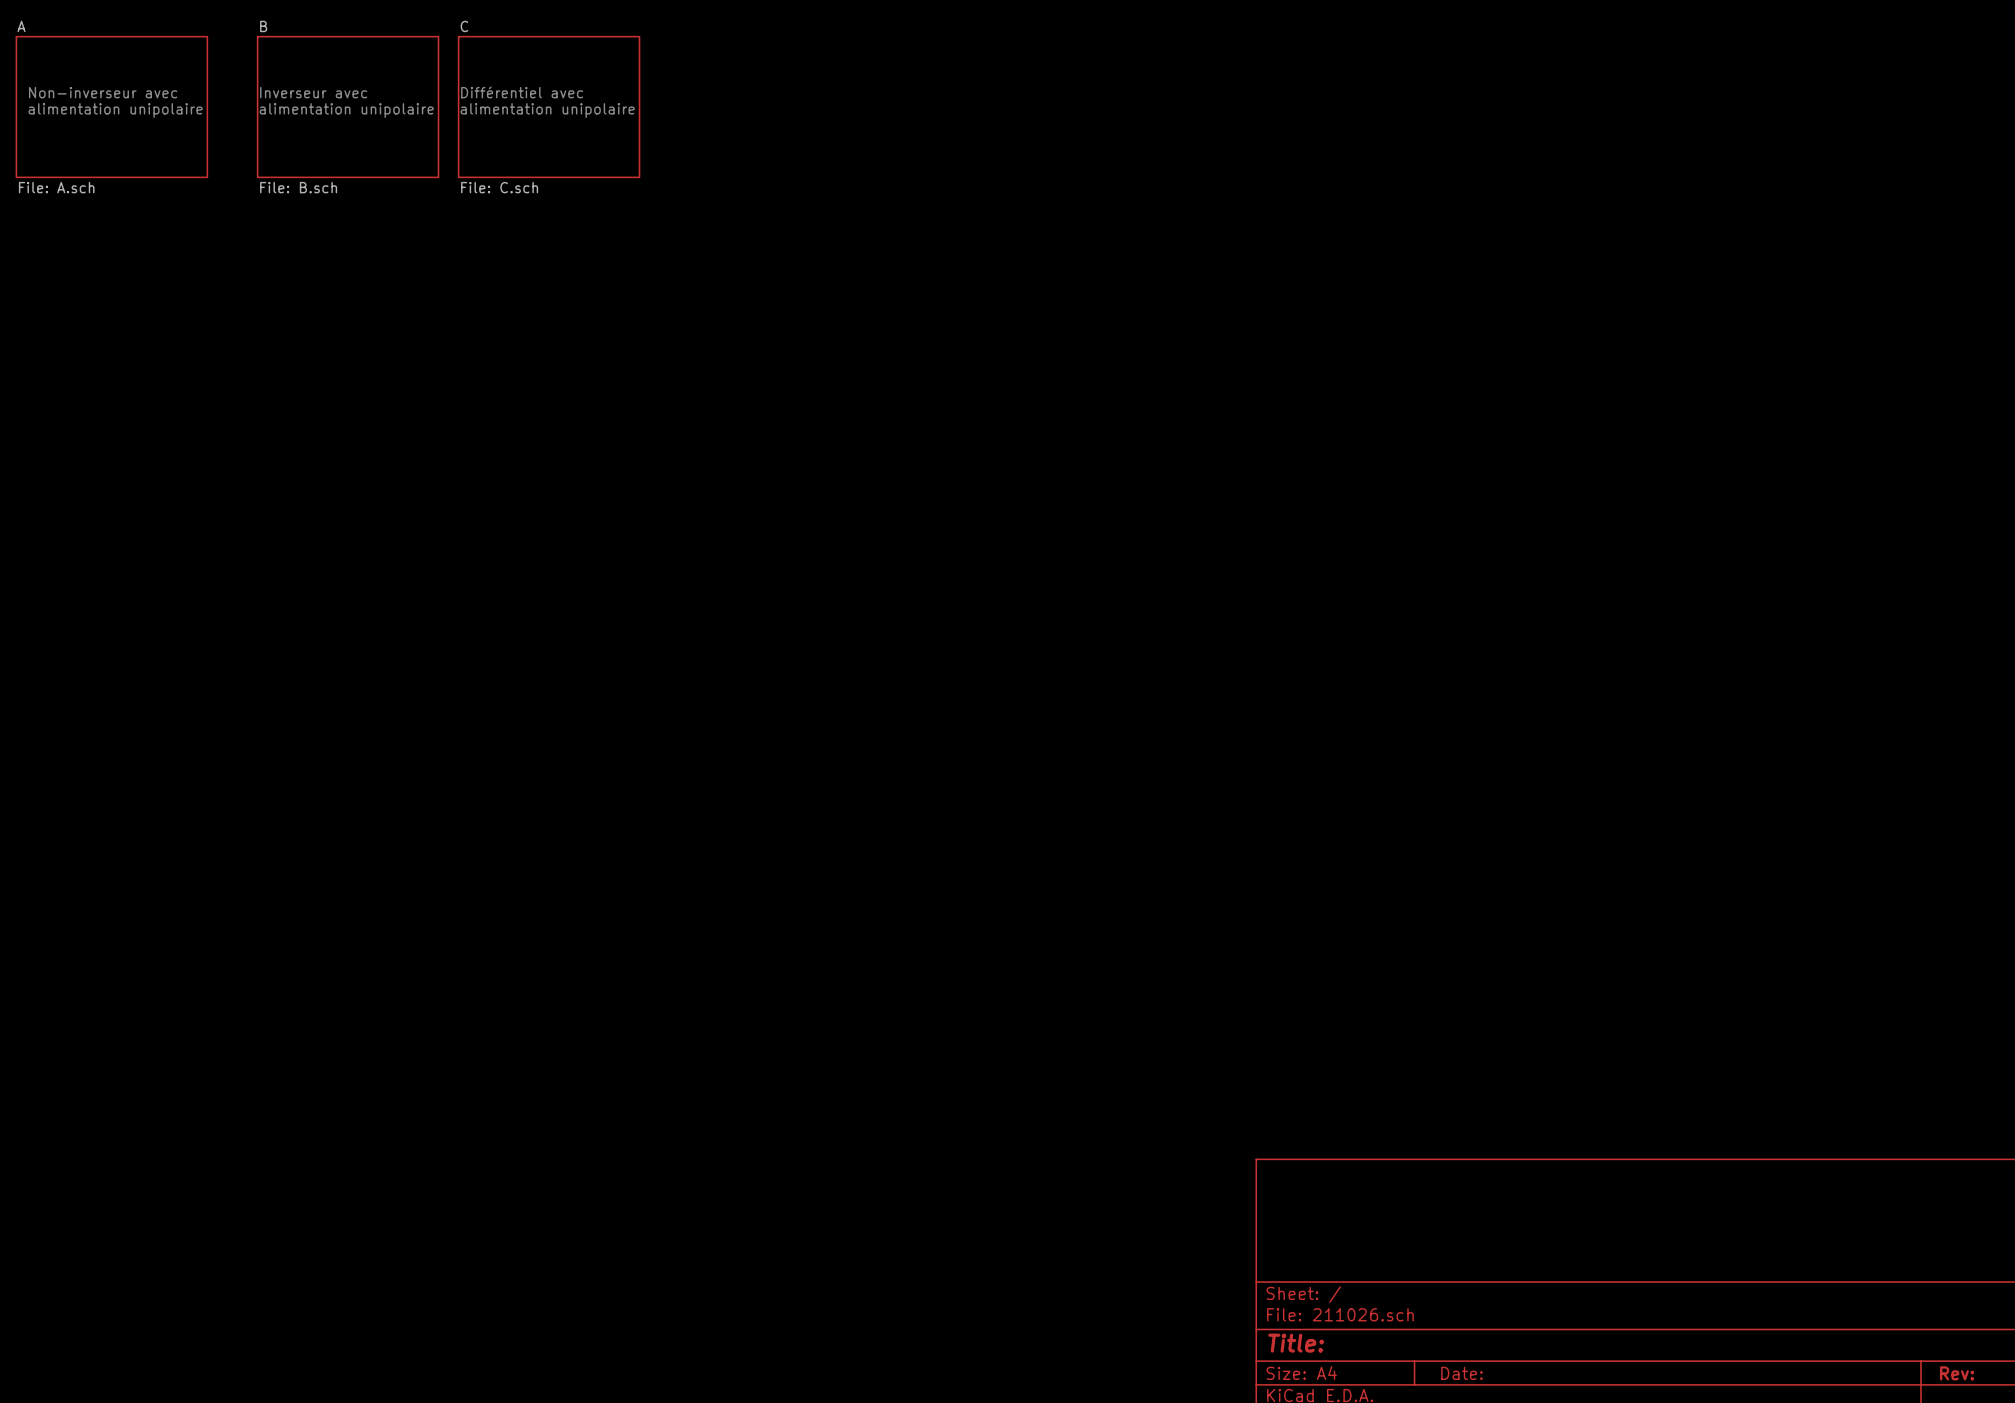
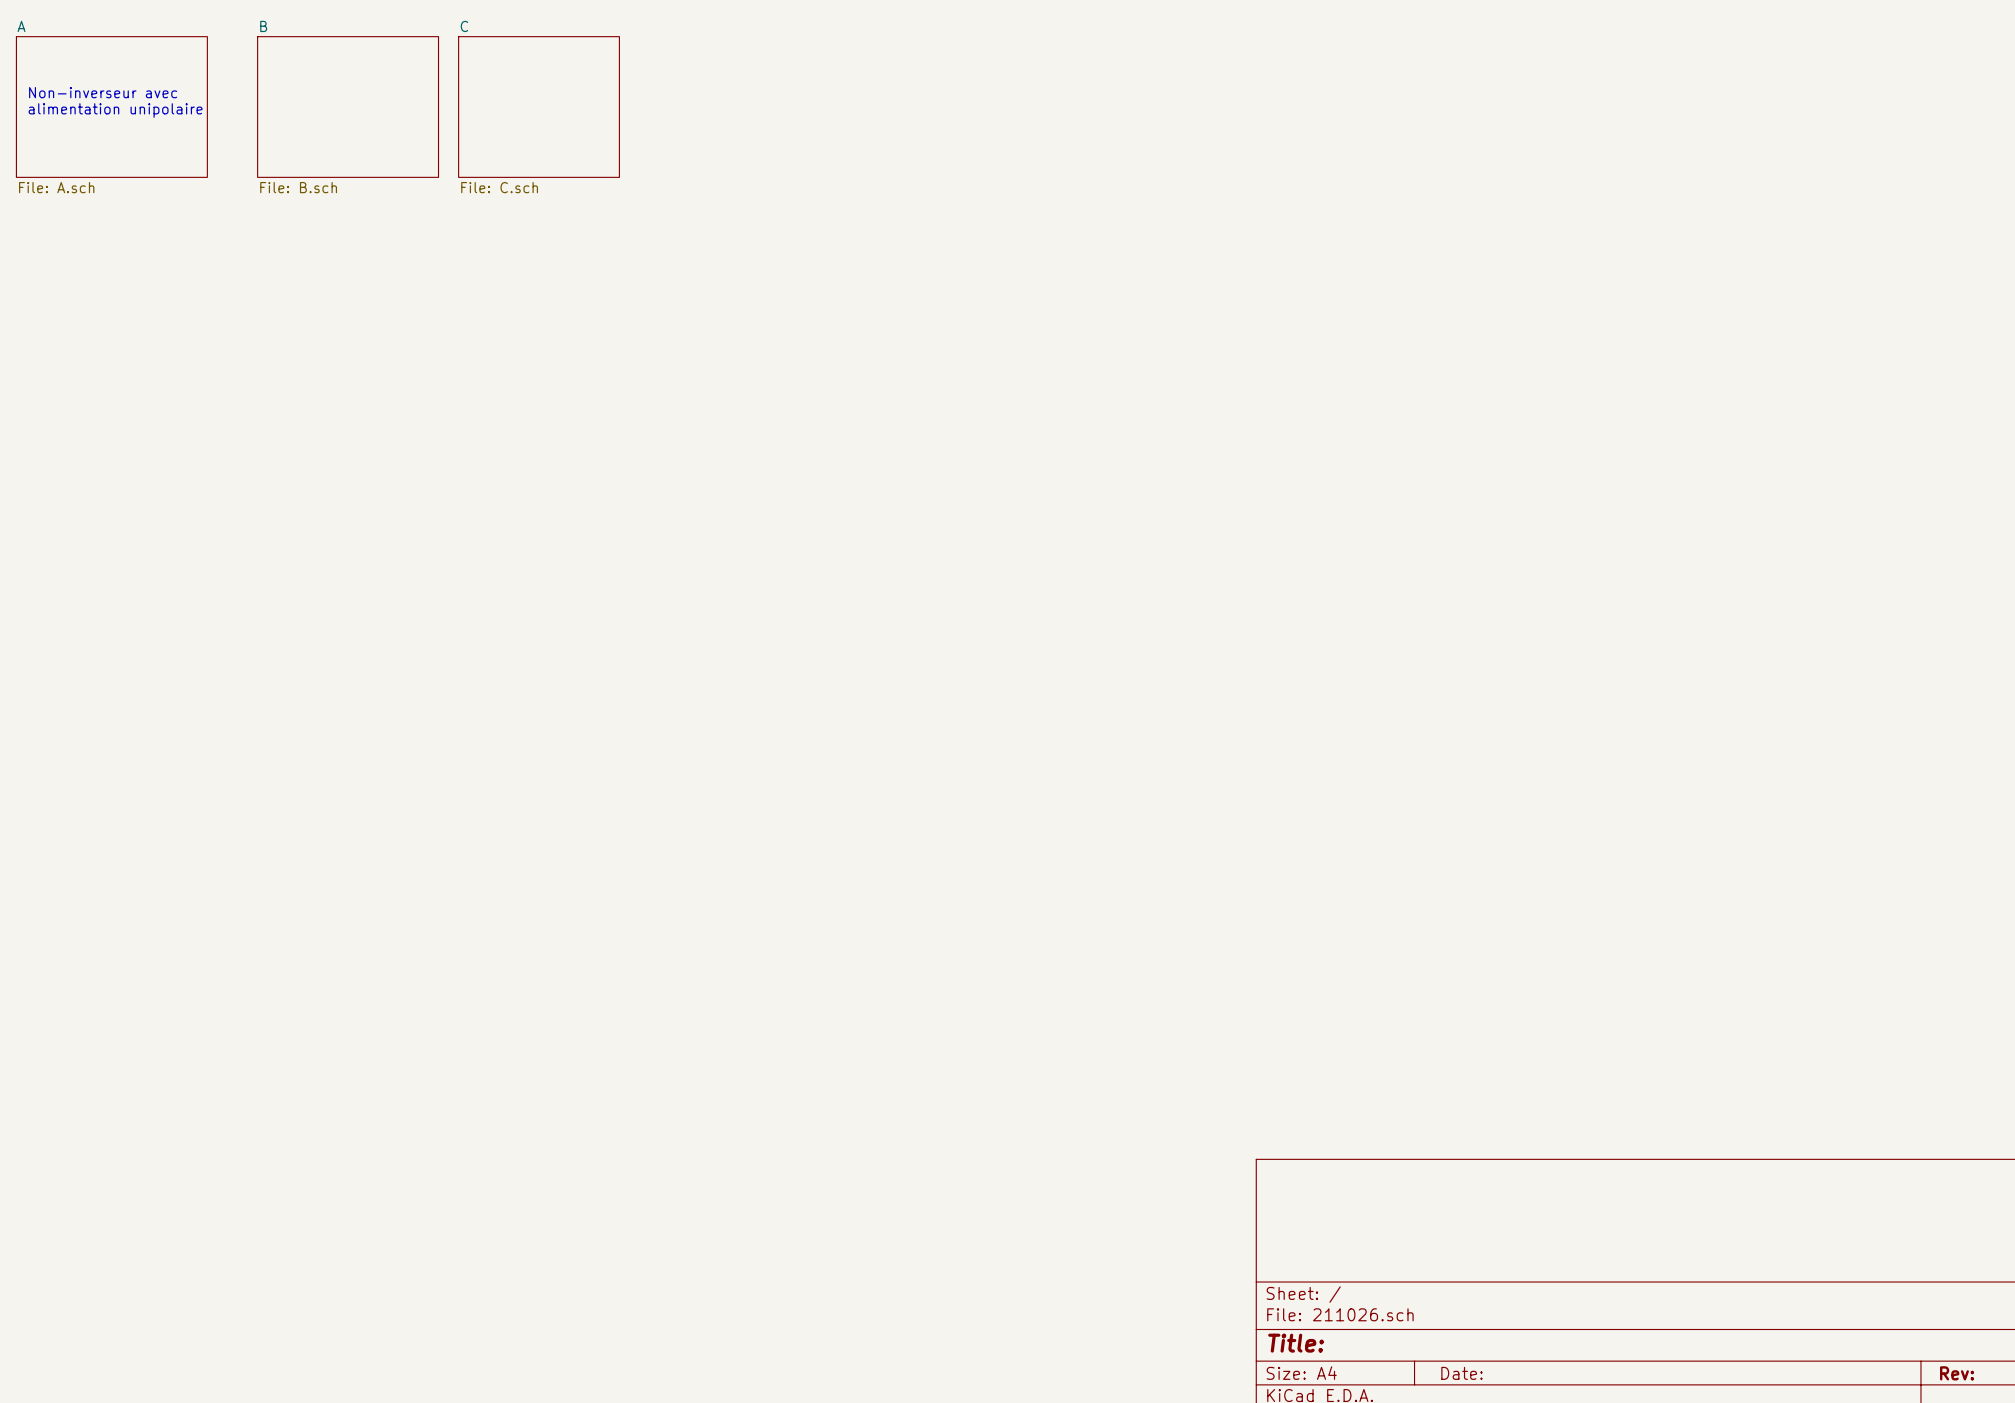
text: Inverseur avec (313, 92) -> none
text: Différentiel avec (522, 92) -> none
sheet C: none -> File: C.sch (539, 107)
sheet C: File: C.sch (549, 107) -> none
text: alimentation unipolaire (346, 110) -> none
text: alimentation unipolaire (547, 110) -> none

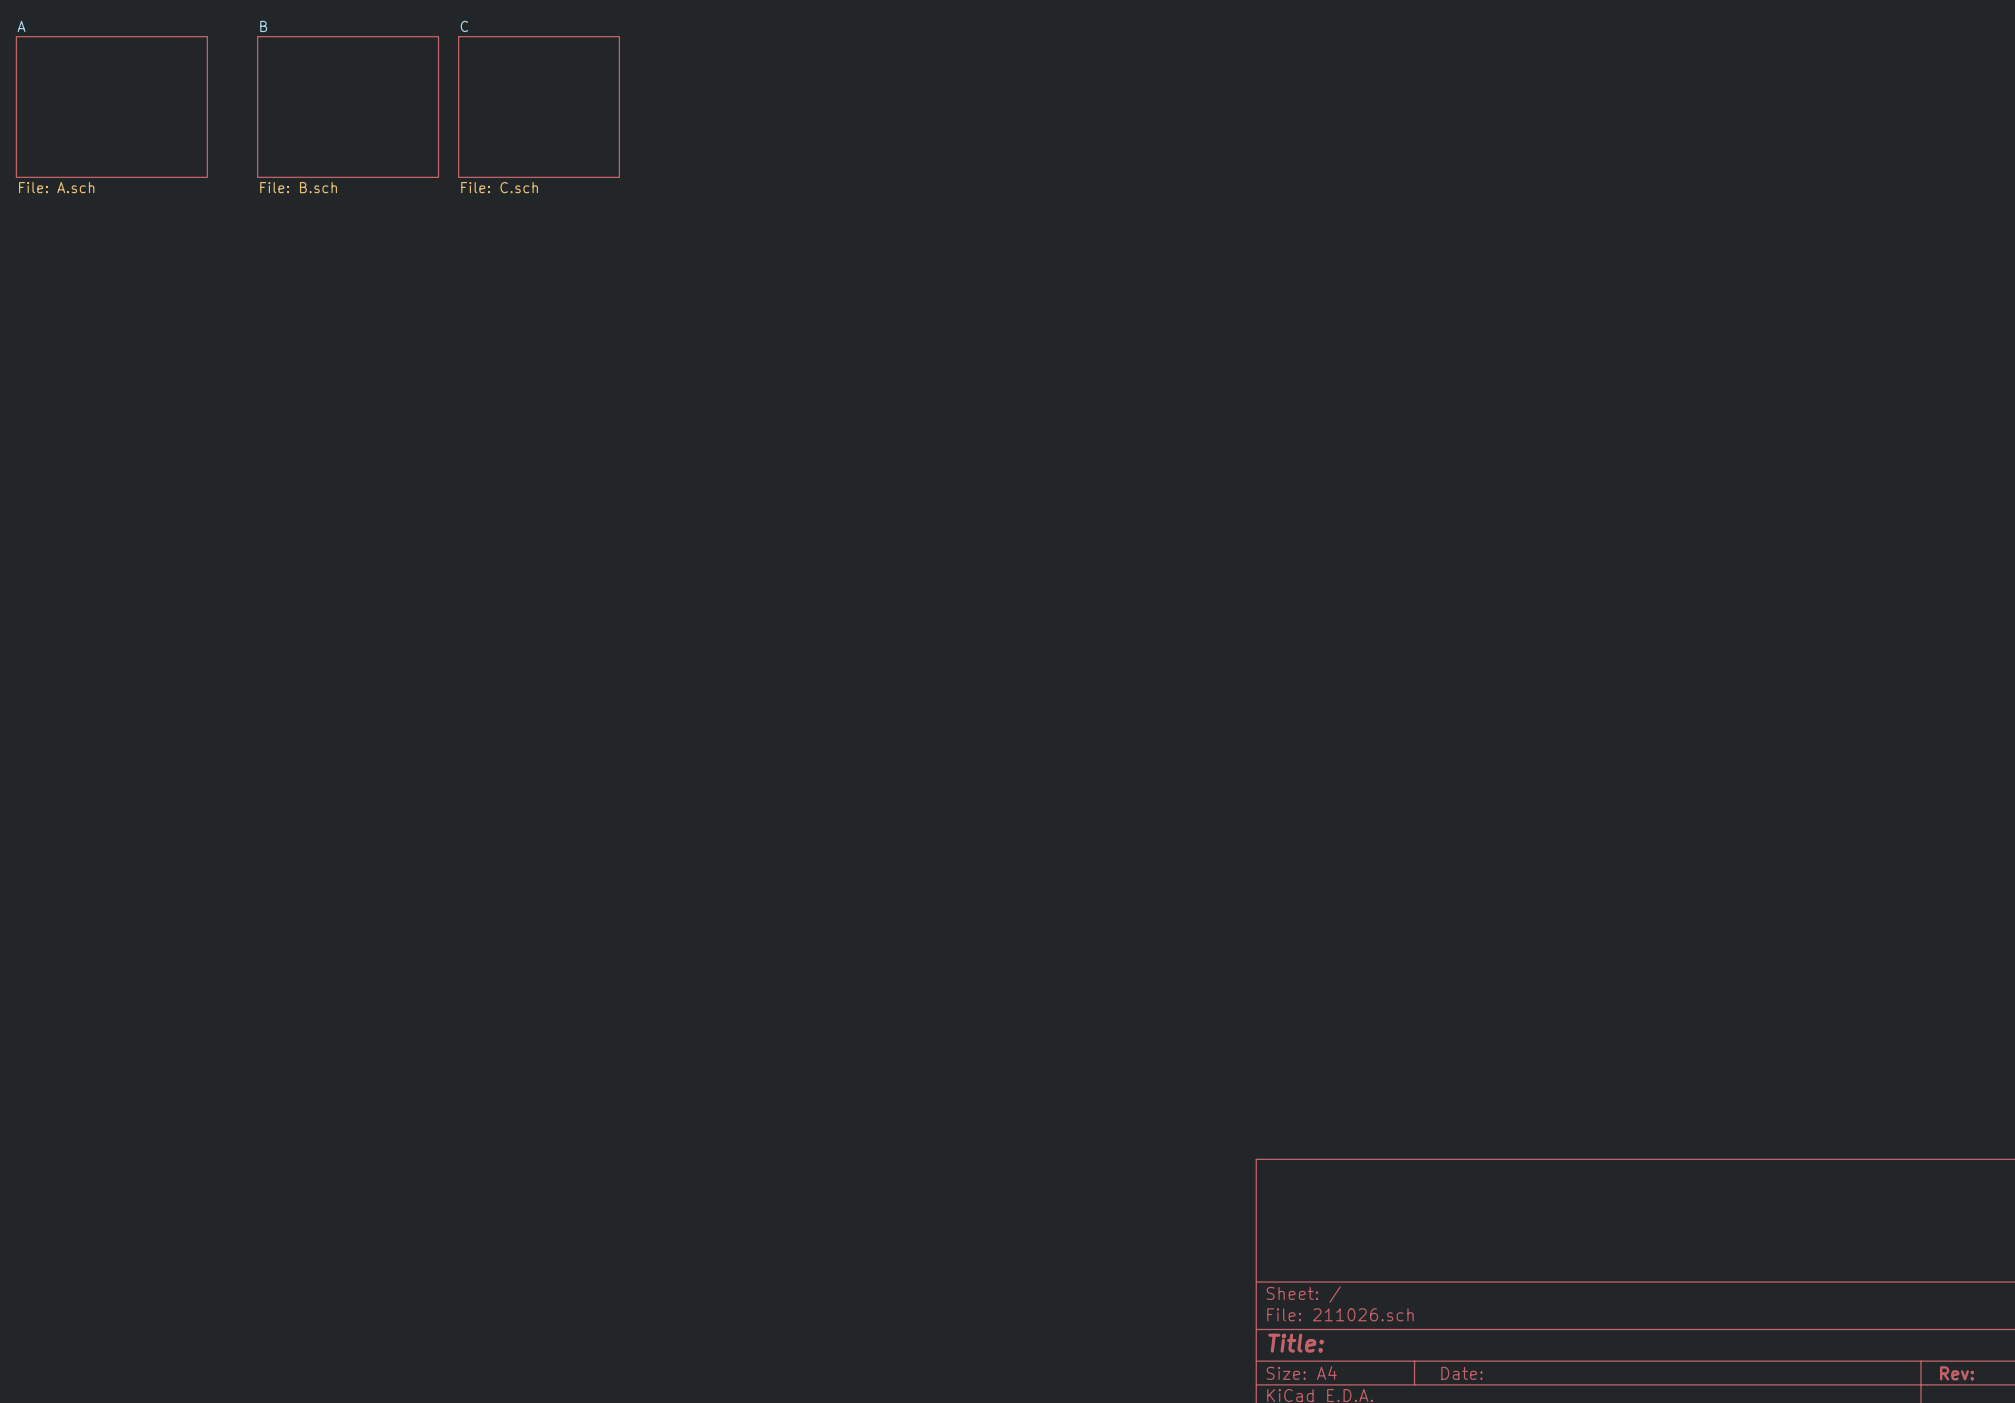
text: Non-inverseur avec (103, 92) -> none
text: alimentation unipolaire (115, 110) -> none

